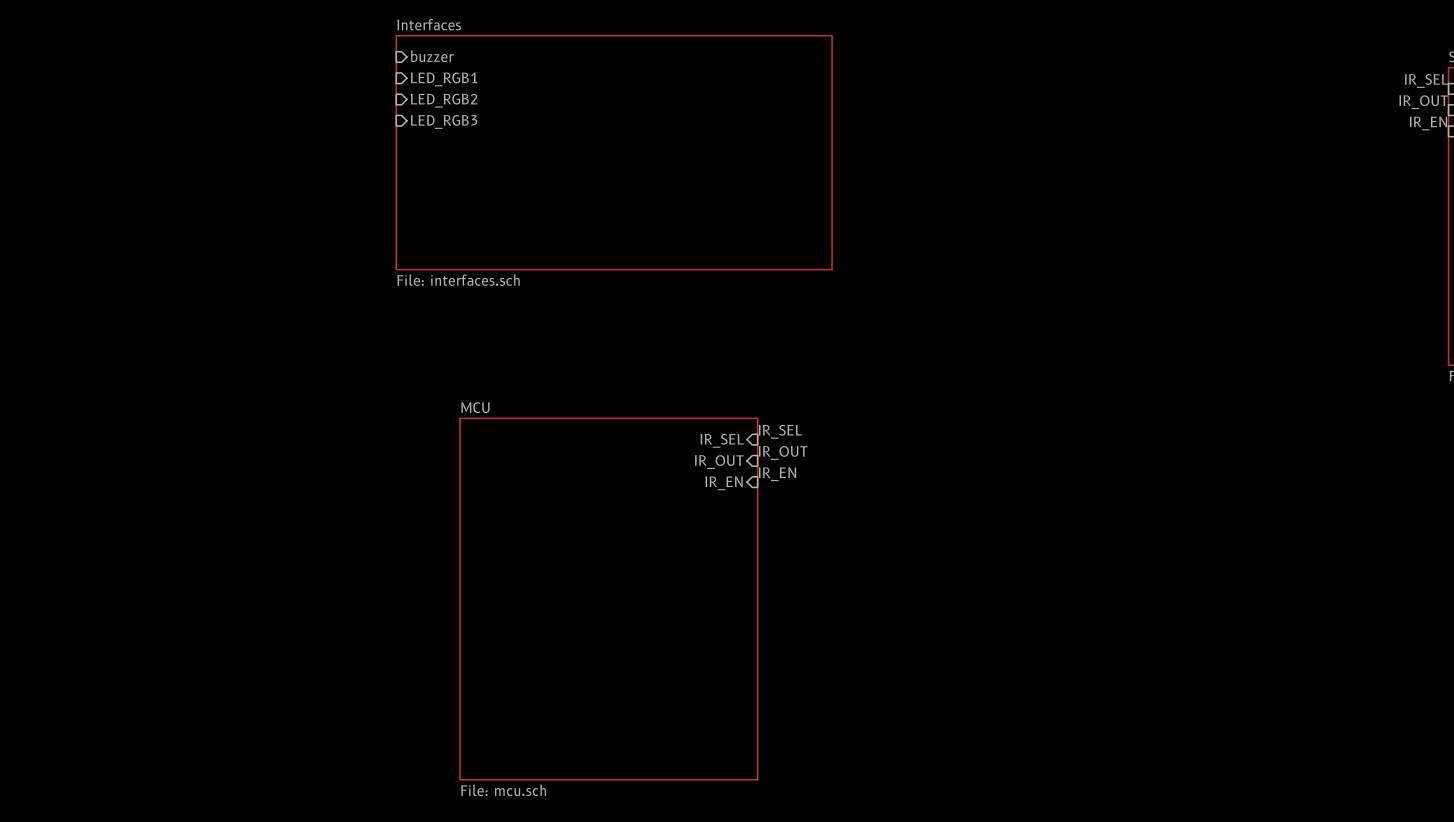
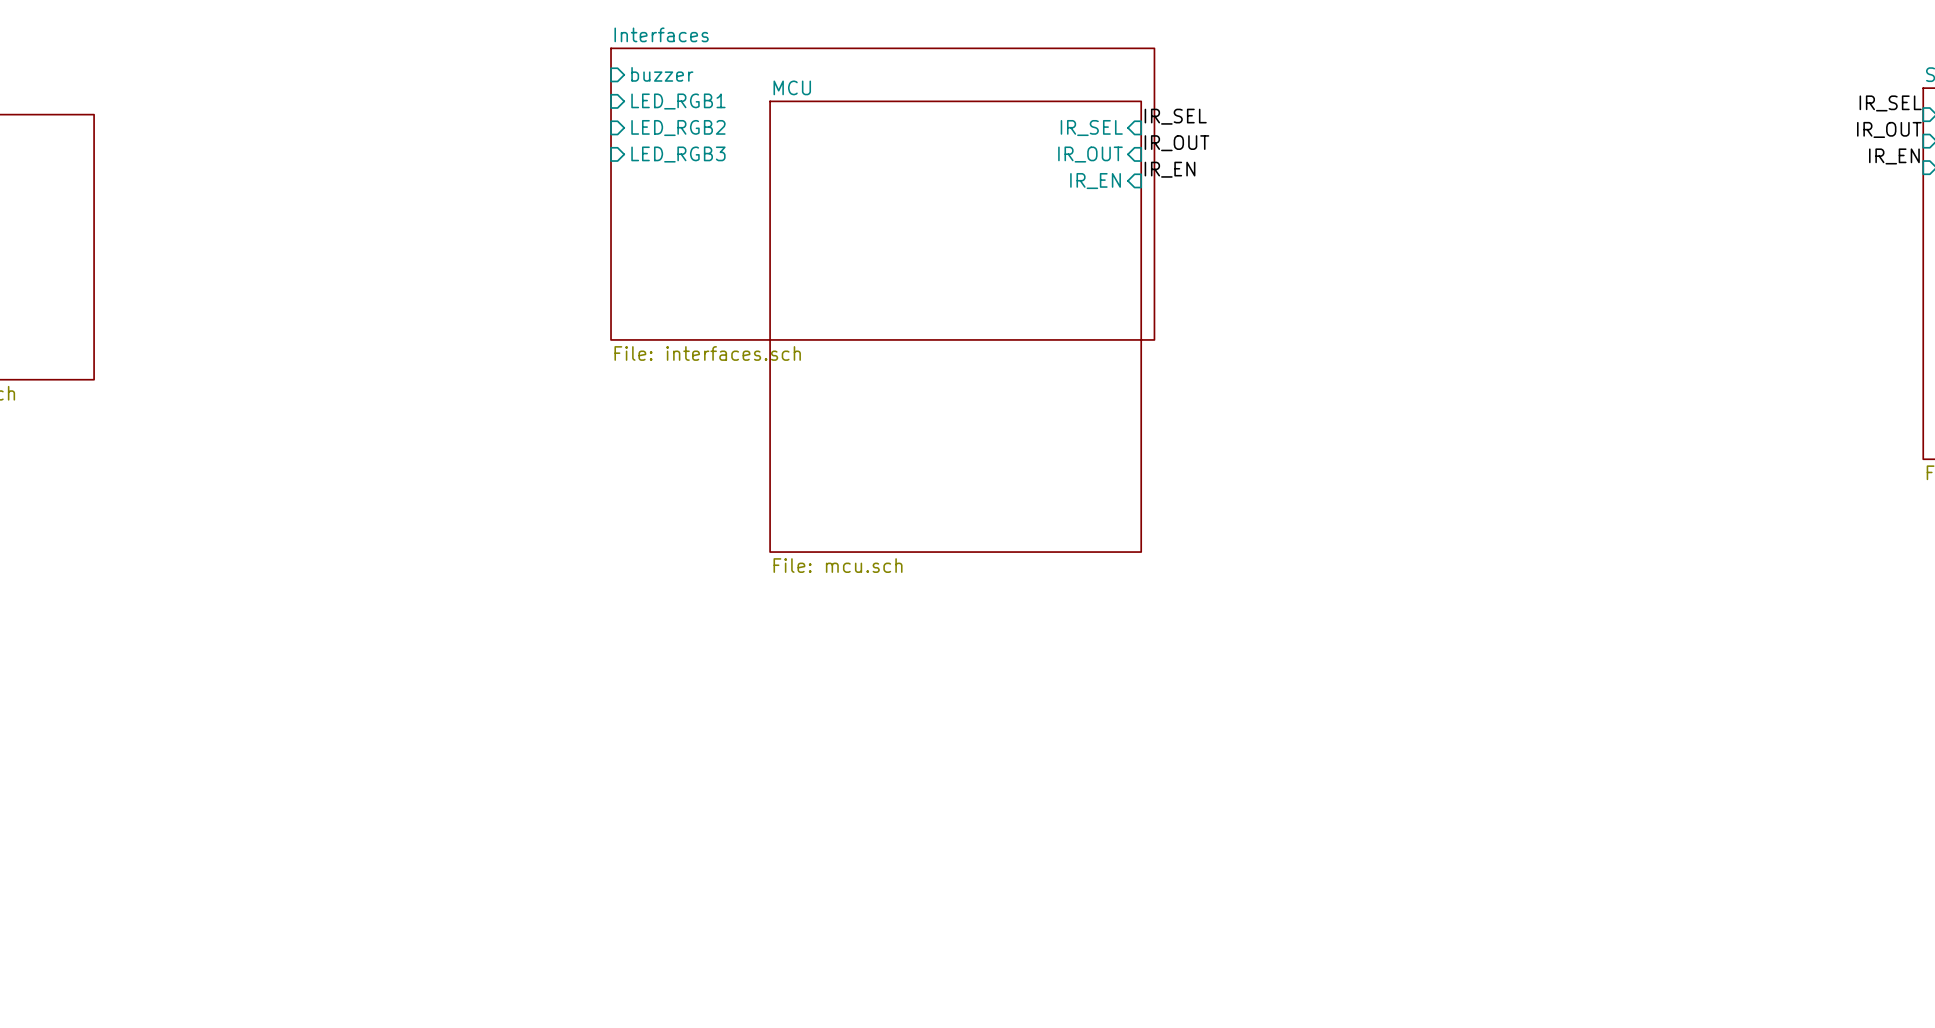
label: none -> IR_SEL (1175, 116)
sheet pin: none -> IR_SEL (1091, 128)
label: none -> IR_OUT (1176, 143)
sheet pin: none -> IR_OUT (1090, 154)
label: none -> IR_EN (1170, 169)
sheet pin: none -> IR_EN (1095, 181)
sheet MCU: none -> File: mcu.sch (955, 326)
label: IR_SEL (780, 431) -> none
sheet pin: IR_SEL (722, 440) -> none
label: IR_OUT (783, 452) -> none
sheet pin: IR_OUT (719, 462) -> none
label: IR_EN (777, 474) -> none
sheet pin: IR_EN (724, 483) -> none
sheet MCU: File: mcu.sch (608, 599) -> none

